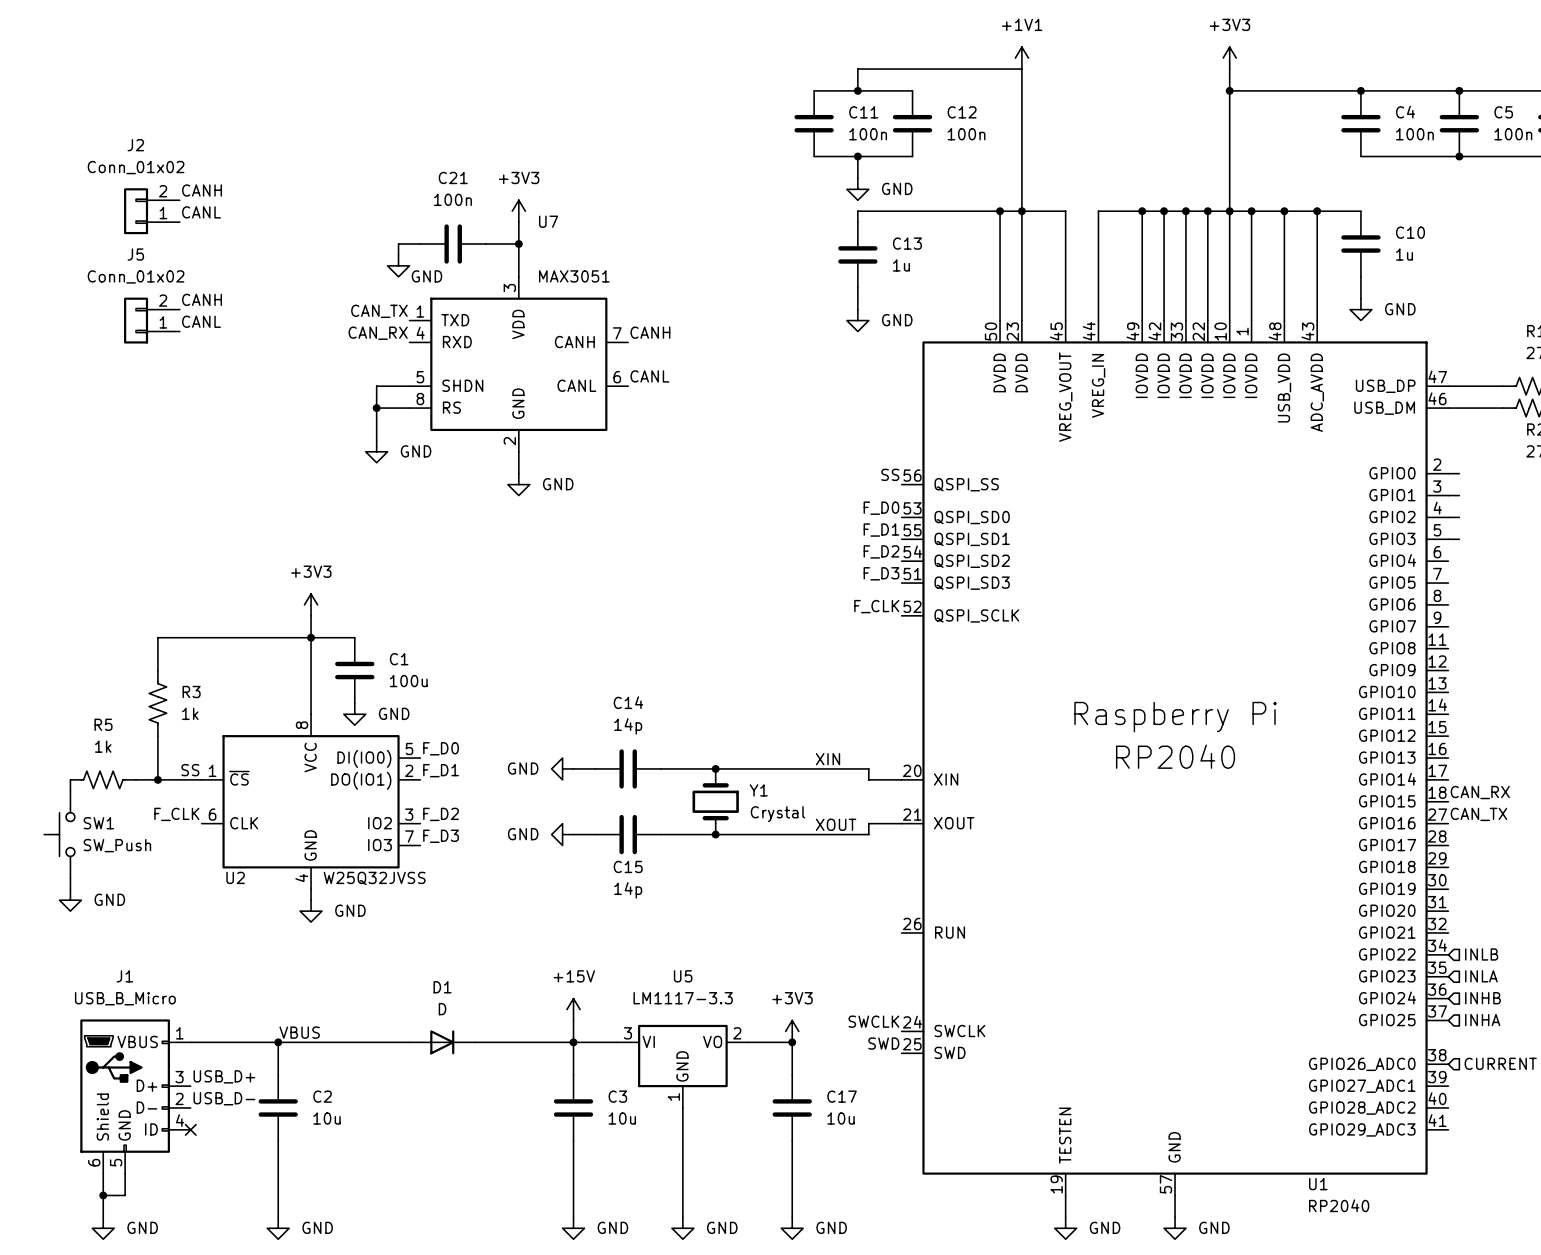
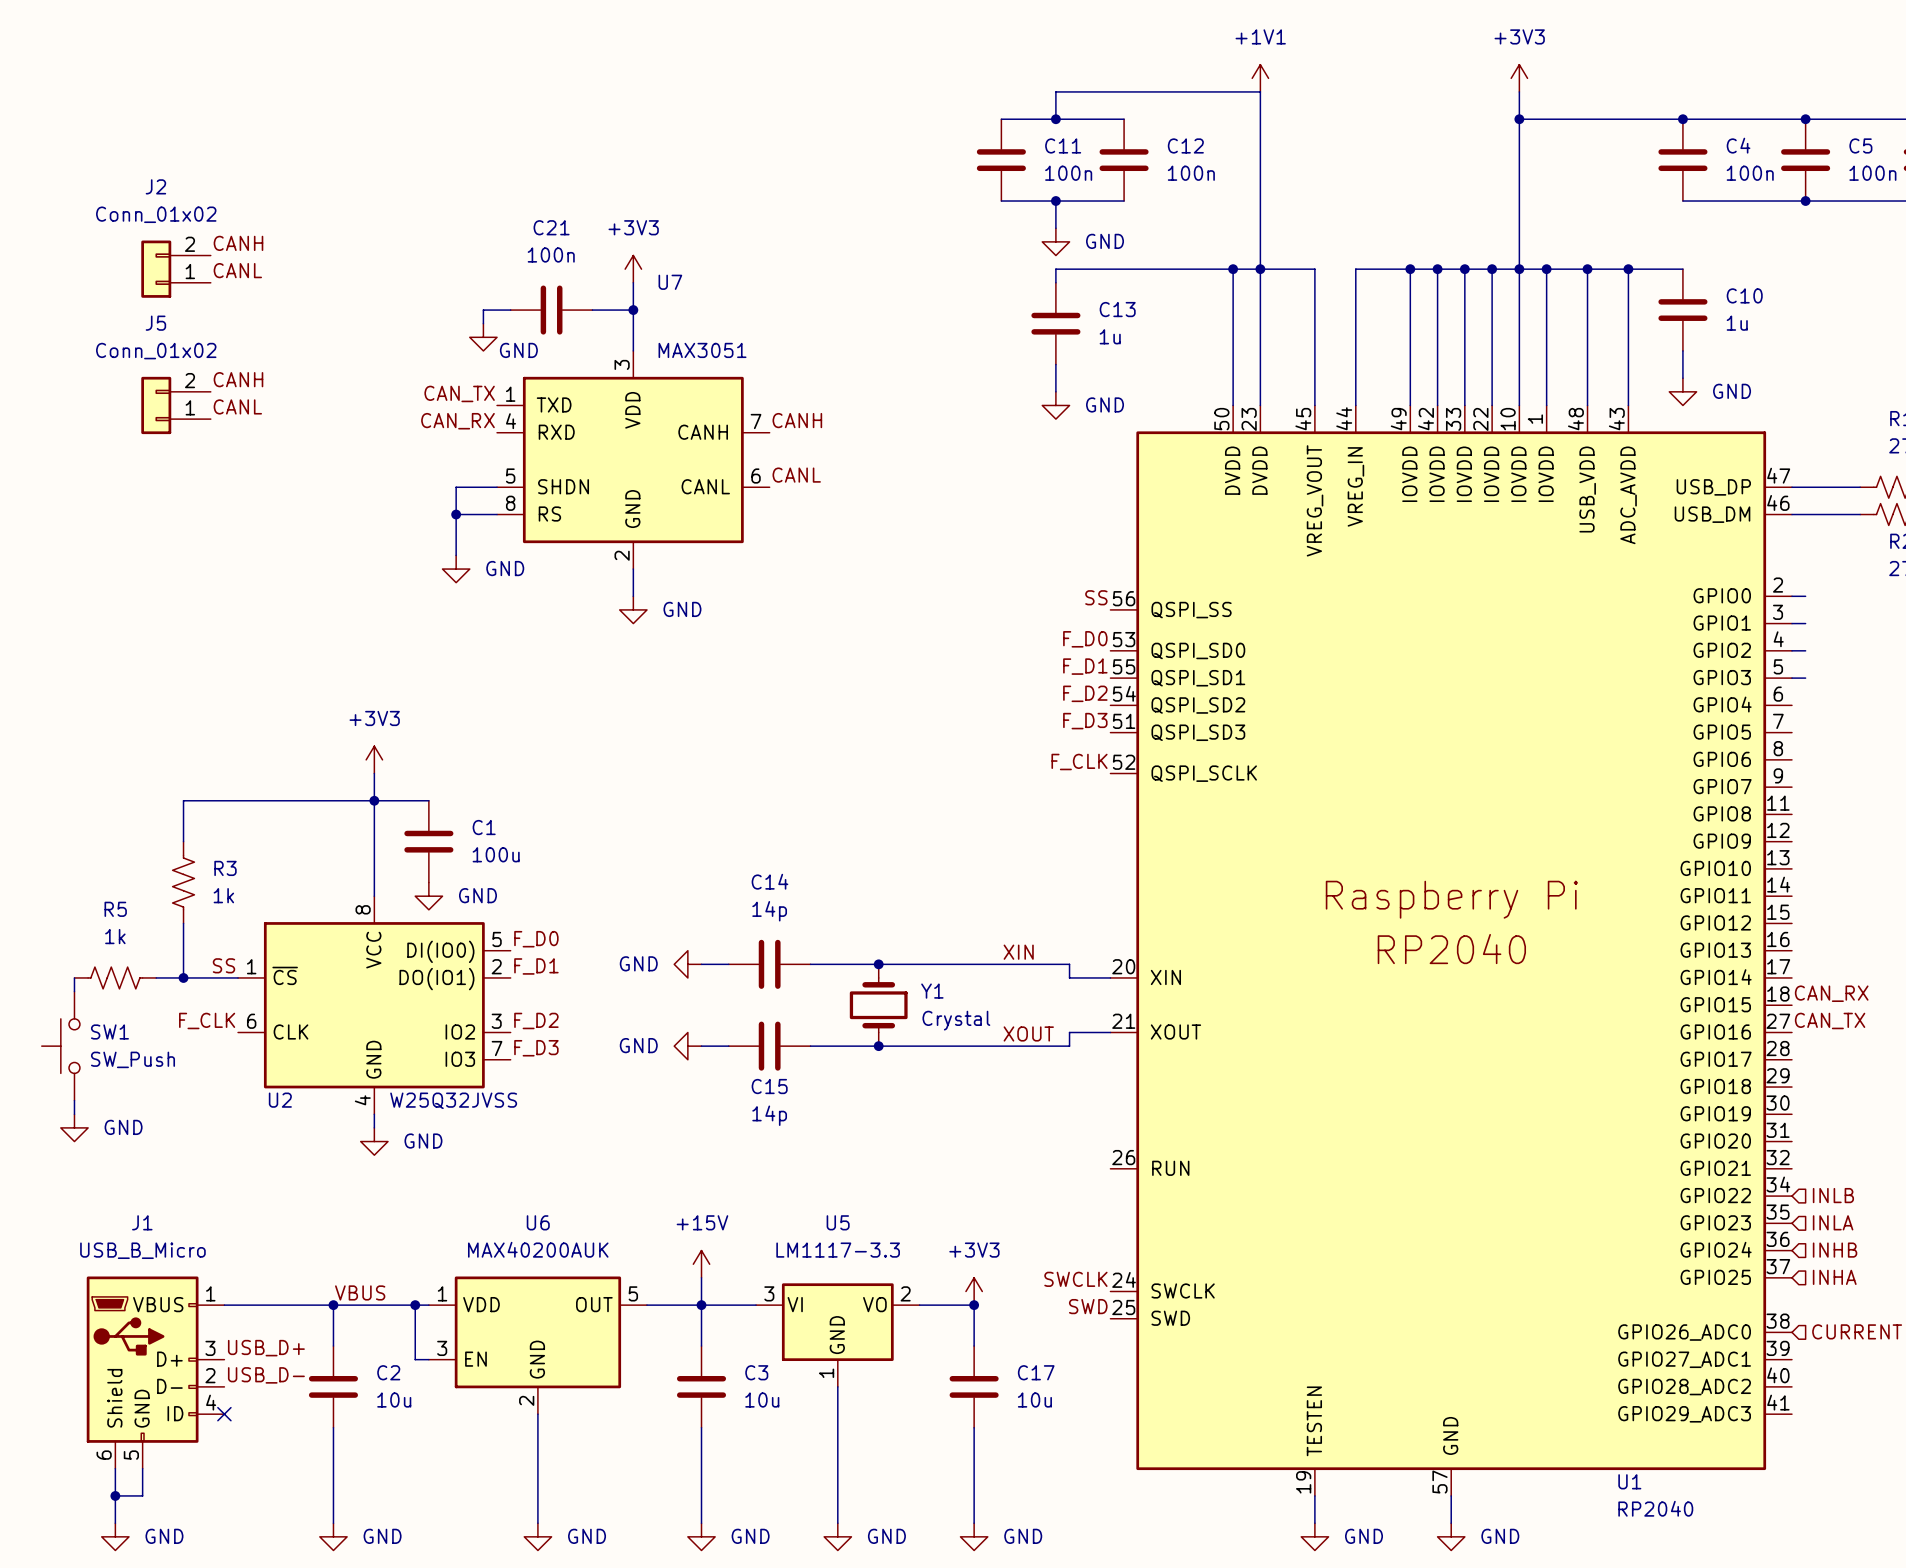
wire: none -> (415, 1305) (415, 1359) (428, 1359)
junction: none -> (415, 1305)
D1: D (442, 1042) -> none
U6: none -> MAX40200AUK (537, 1345)
wire: none -> (537, 1414) (537, 1523)
power symbol: none -> GND (537, 1536)

